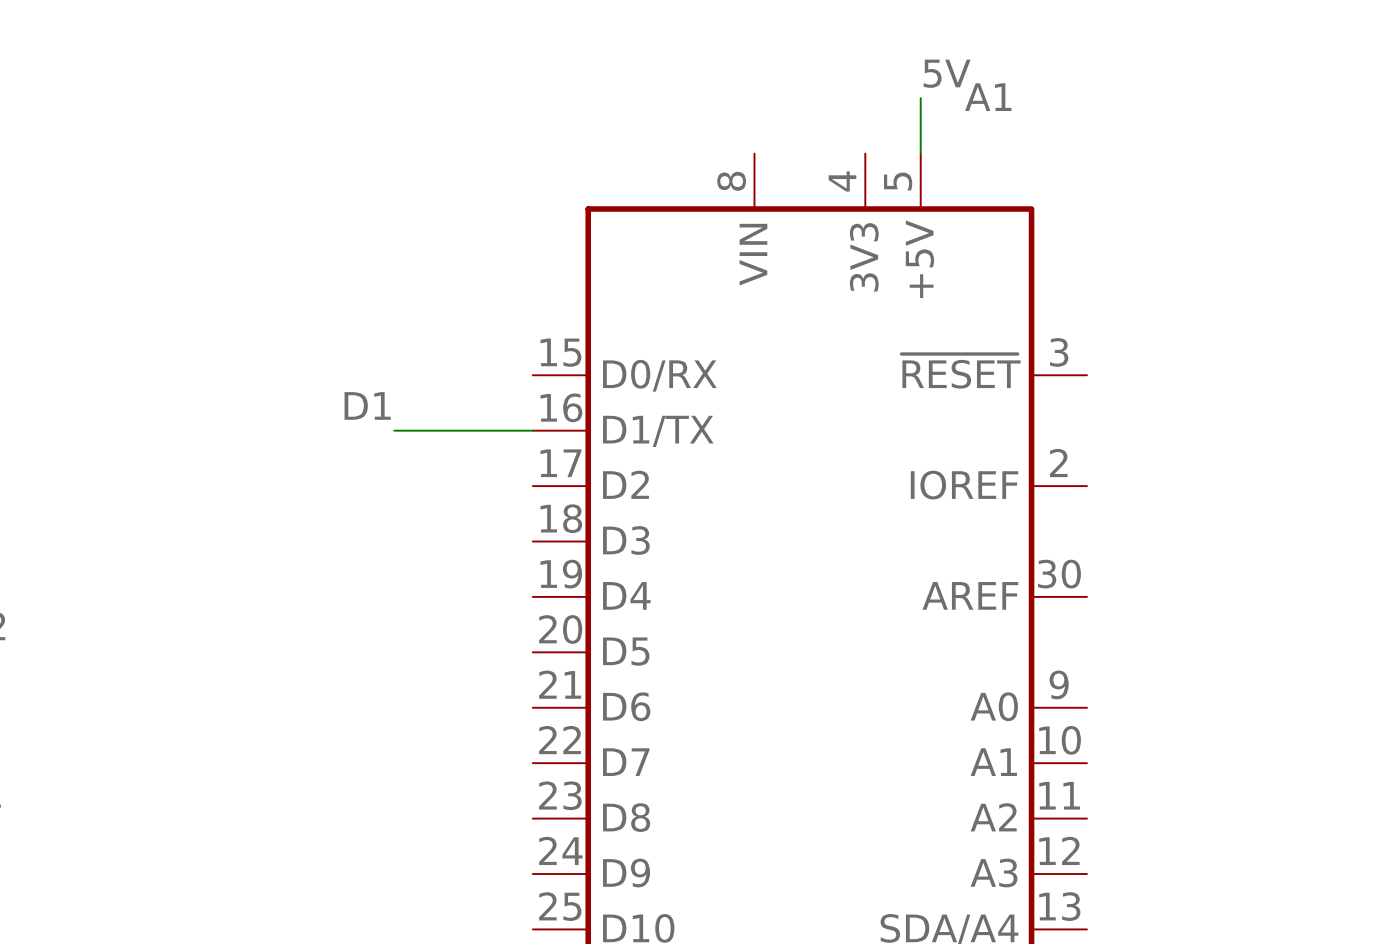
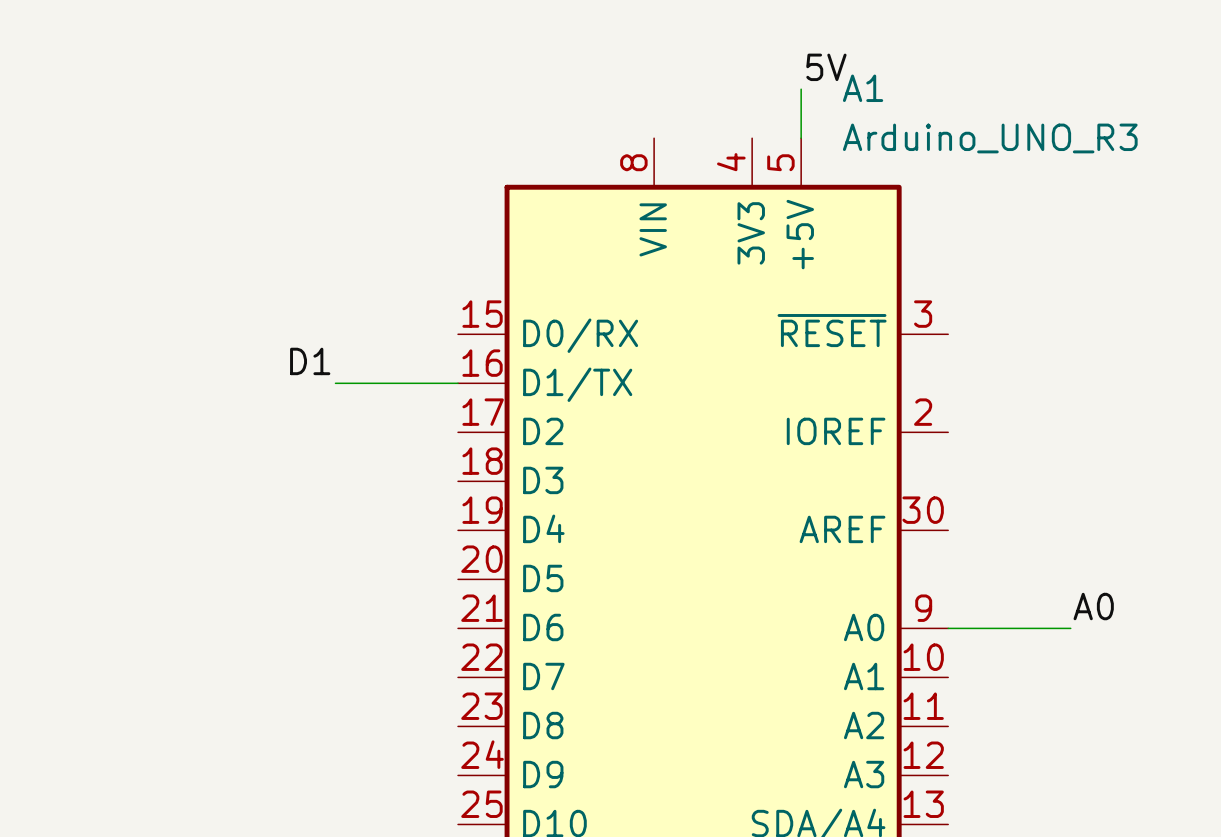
A1 value: none -> Arduino_UNO_R3 (990, 138)
label: none -> A0 (1093, 606)
wire: none -> (948, 628) (1070, 628)

